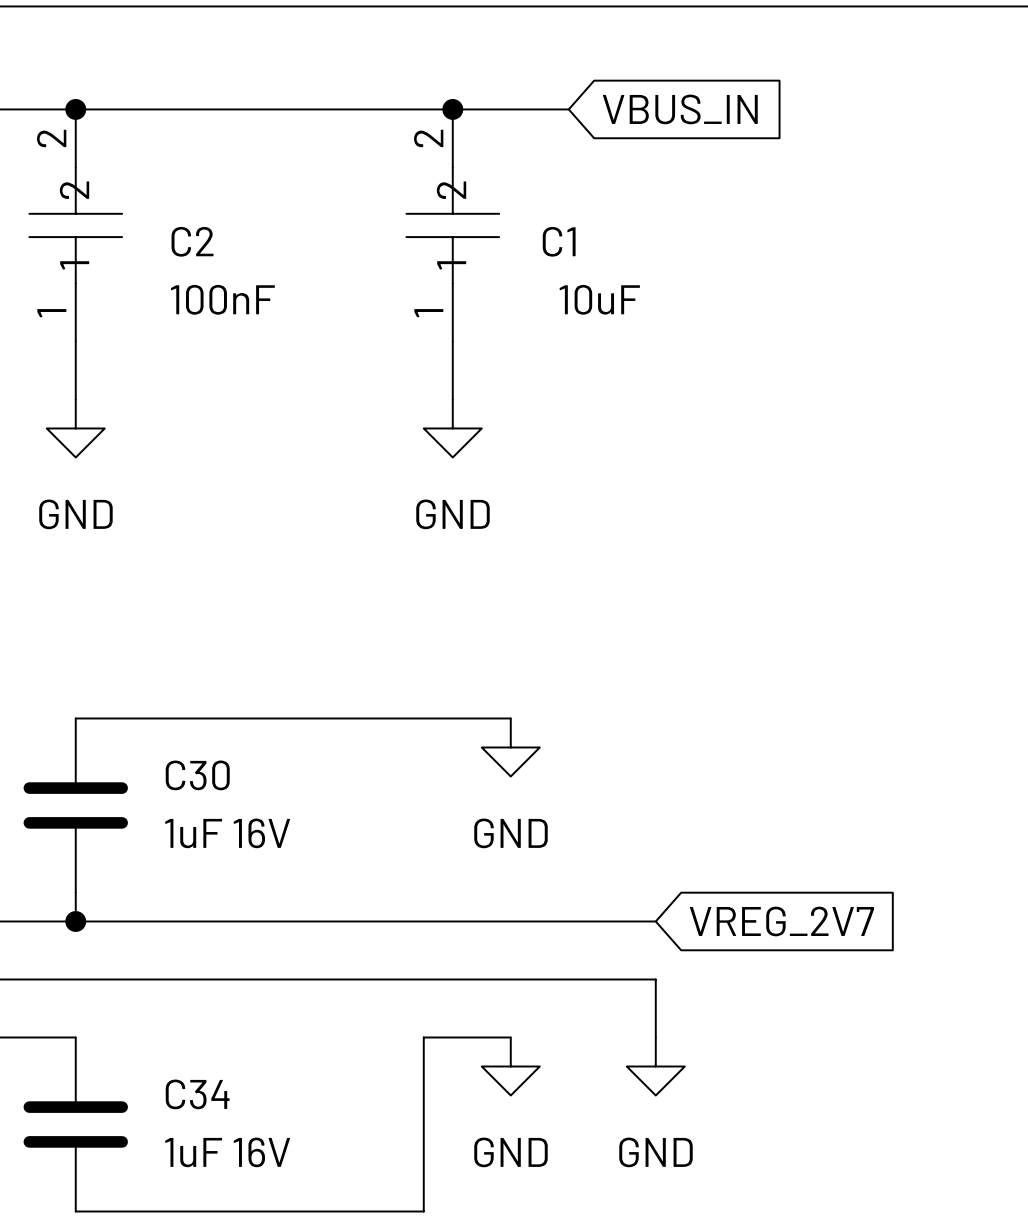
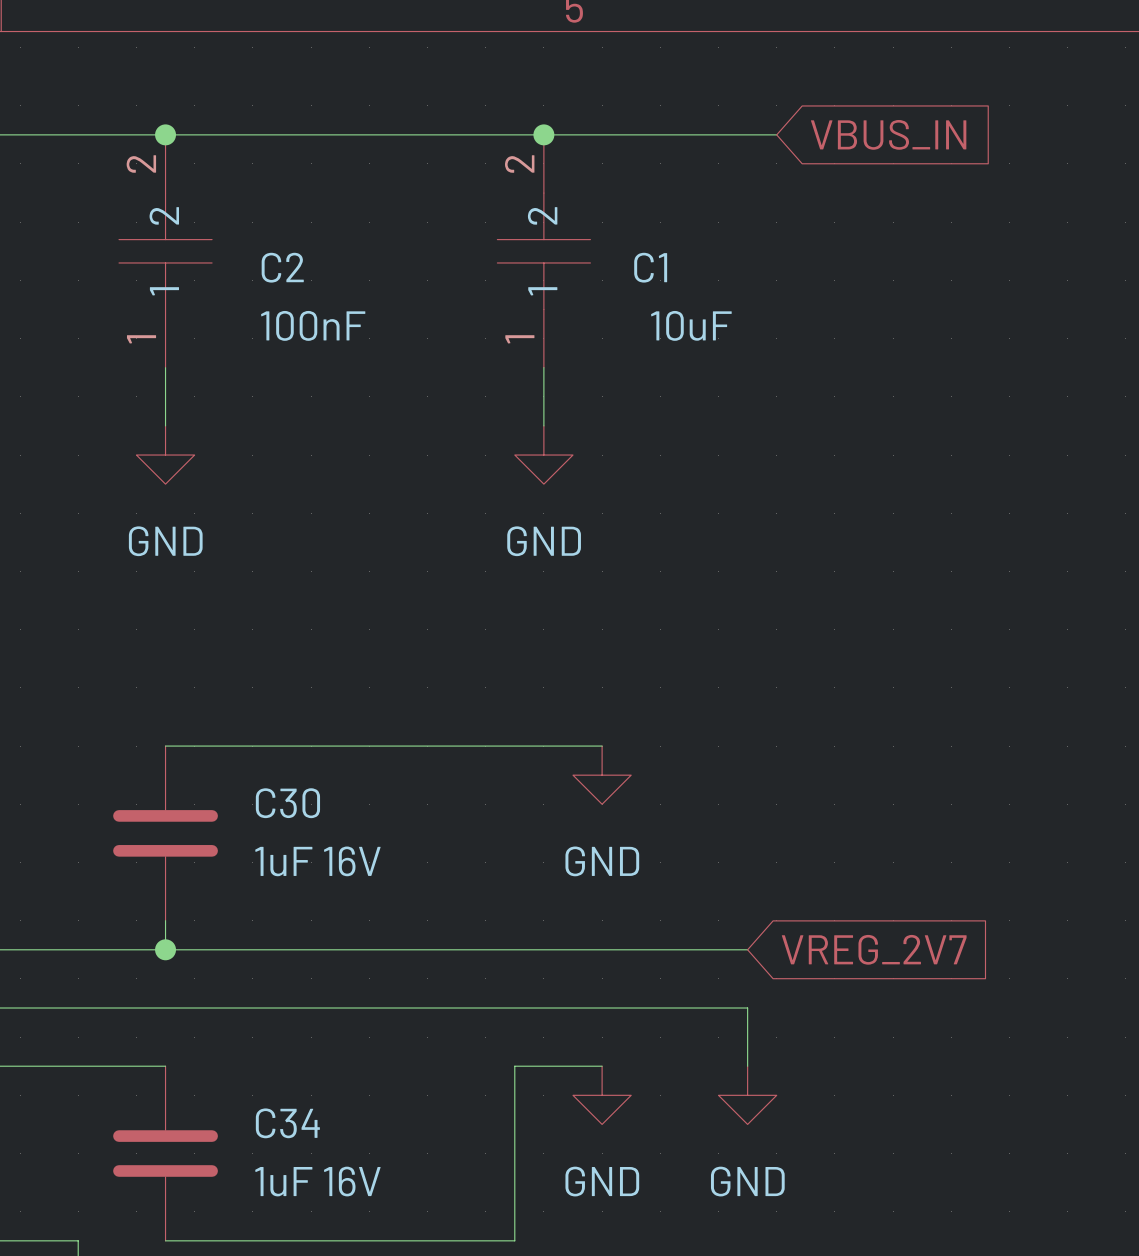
wire: none -> (660, 134) (776, 134)
global label position: VBUS_IN (680, 109) -> VBUS_IN (888, 134)

